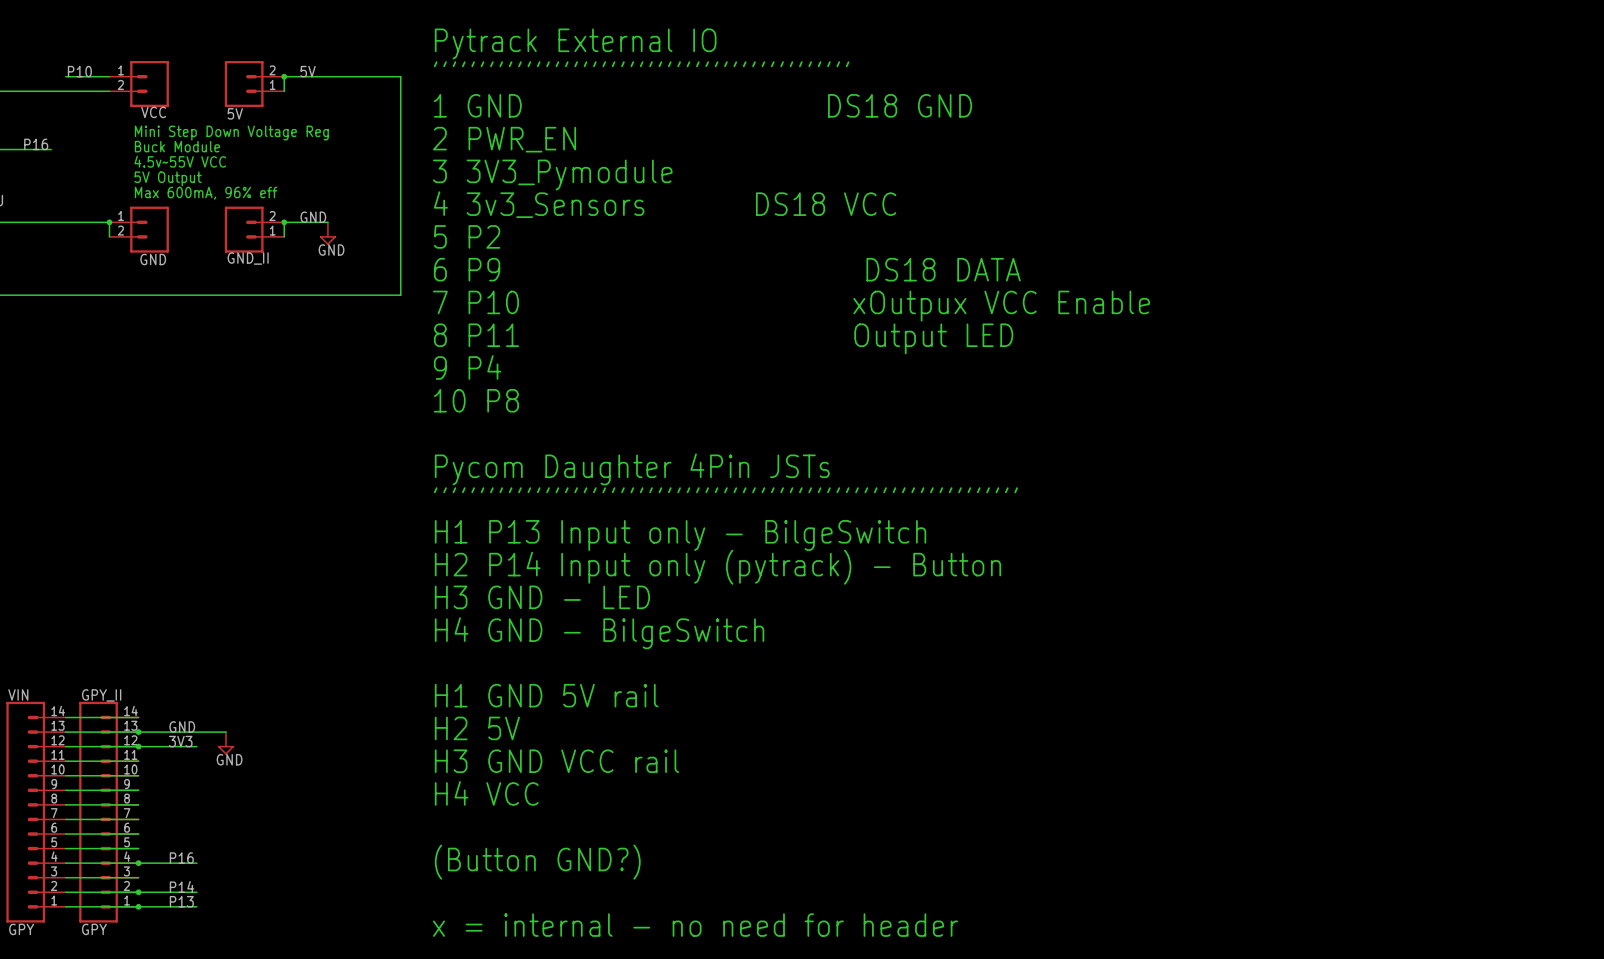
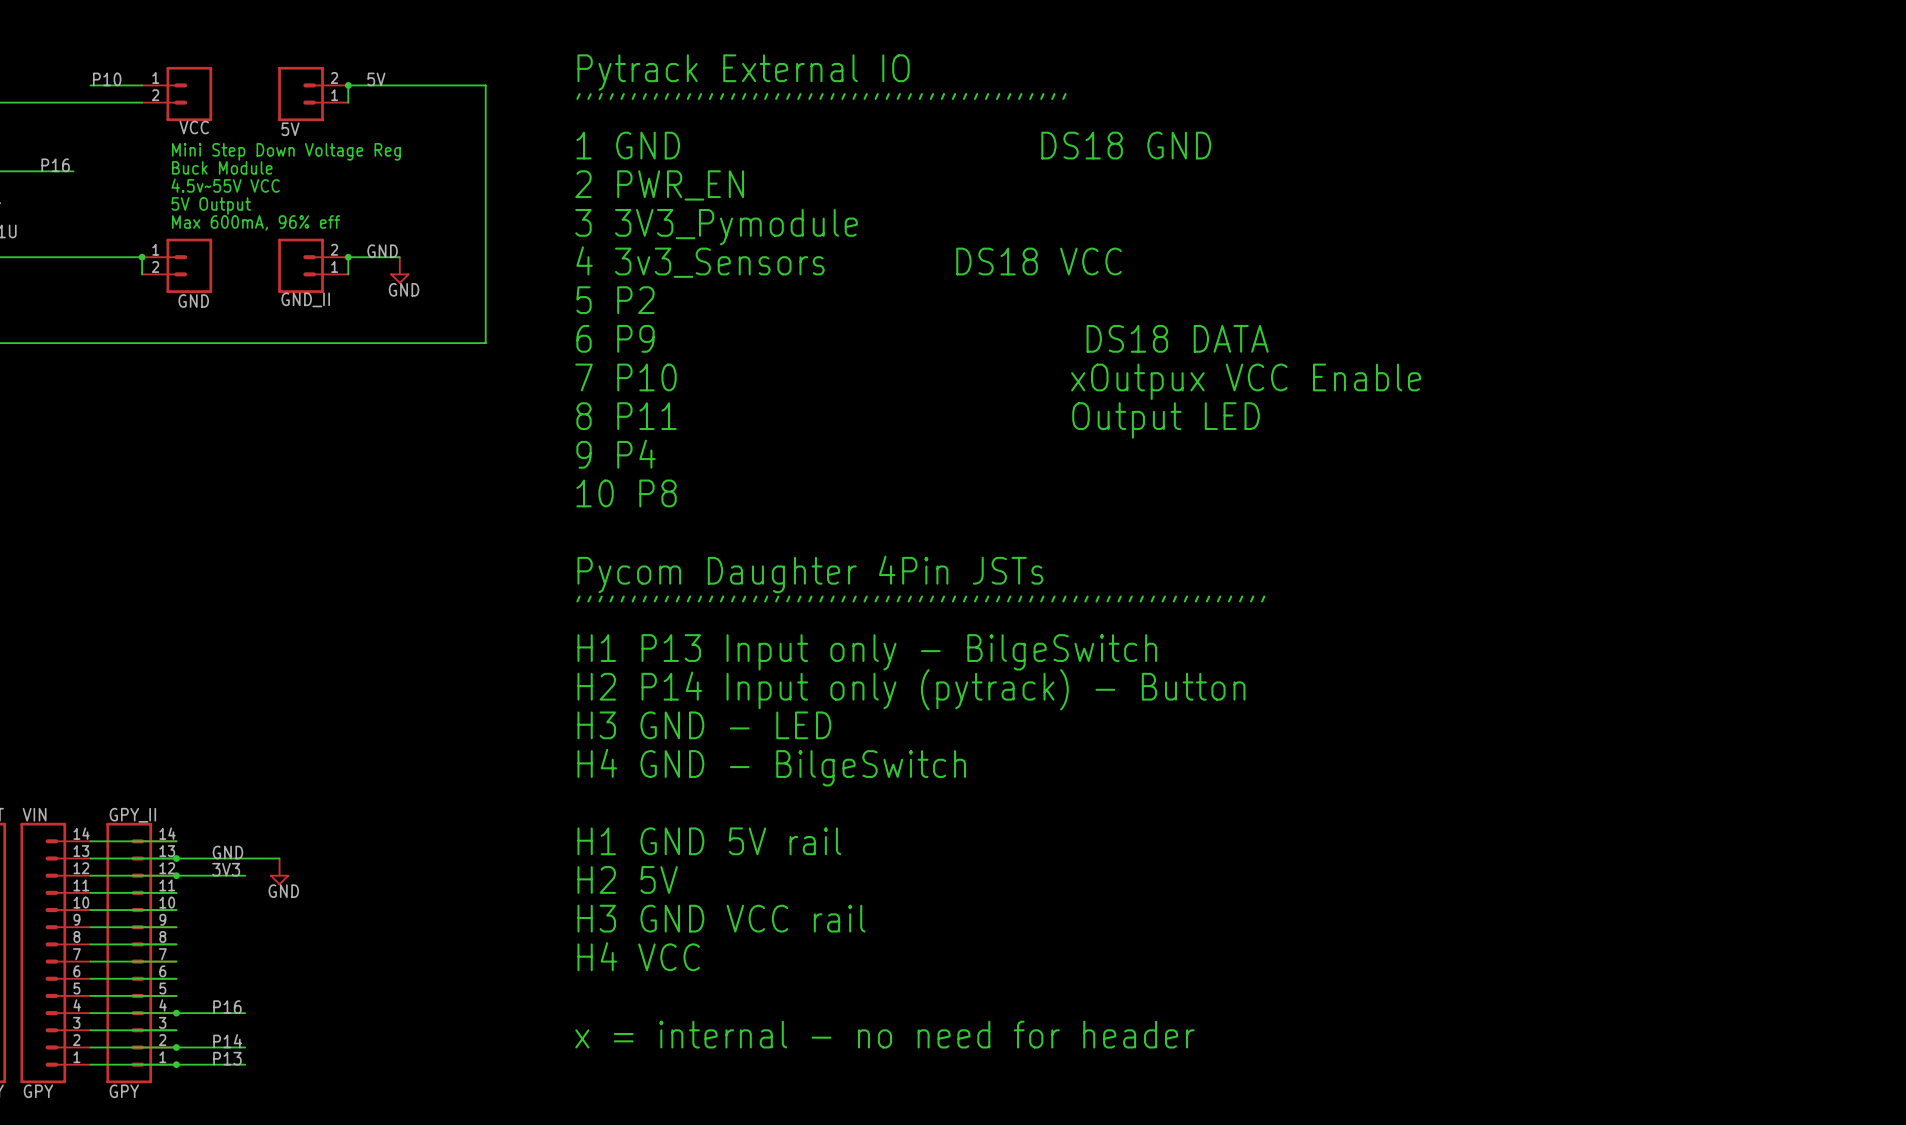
text position: Pytrack External IO (575, 43) -> Pytrack External IO (743, 72)
text position: ''''''''''''''''''''''''''''''''''''''''''''' (641, 64) -> ''''''''''''''''''''''''''''''''''''''''''''' (821, 96)
text position: 1 GND DS18 GND (703, 105) -> 1 GND DS18 GND (893, 145)
text position: 2 PWR_EN (504, 139) -> 2 PWR_EN (659, 185)
text position: 3 3V3_Pymodule (552, 175) -> 3 3V3_Pymodule (716, 227)
text position: 4 3v3_Sensors DS18 VCC (665, 204) -> 4 3v3_Sensors DS18 VCC (849, 262)
text position: 5 P2 (467, 236) -> 5 P2 (615, 300)
text position: 6 P9 DS18 DATA (727, 269) -> 6 P9 DS18 DATA (922, 338)
text position: 7 P10 xOutpux VCC Enable (791, 306) -> 7 P10 xOutpux VCC Enable (998, 381)
text position: 8 P11 Output LED (723, 338) -> 8 P11 Output LED (918, 420)
text position: 9 P4 (467, 367) -> 9 P4 (616, 454)
text position: 10 P8 (476, 400) -> 10 P8 (626, 493)
text position: Pycom Daughter 4Pin JSTs (632, 469) -> Pycom Daughter 4Pin JSTs (810, 574)
text position: ''''''''''''''''''''''''''''''''''''''''''''''''''''''''''''''' (725, 490) -> ''''''''''''''''''''''''''''''''''''''''''''''''''''''''''''''' (920, 598)
text position: H1 P13 Input only - BilgeSwitch (680, 535) -> H1 P13 Input only - BilgeSwitch (867, 652)
text position: H2 P14 Input only (pytrack) - Button (717, 567) -> H2 P14 Input only (pytrack) - Button (911, 689)
text position: H3 GND - LED (542, 597) -> H3 GND - LED (704, 725)
text position: H4 GND - BilgeSwitch (599, 633) -> H4 GND - BilgeSwitch (771, 767)
text position: H1 GND 5V rail (546, 695) -> H1 GND 5V rail (709, 841)
text position: H2 5V (477, 728) -> H2 5V (627, 879)
text position: H3 GND VCC rail (556, 761) -> H3 GND VCC rail (721, 918)
text position: H4 VCC (486, 793) -> H4 VCC (638, 956)
text: (Button GND?) (537, 862) -> none
text position: x = internal - no need for header (695, 925) -> x = internal - no need for header (884, 1034)

